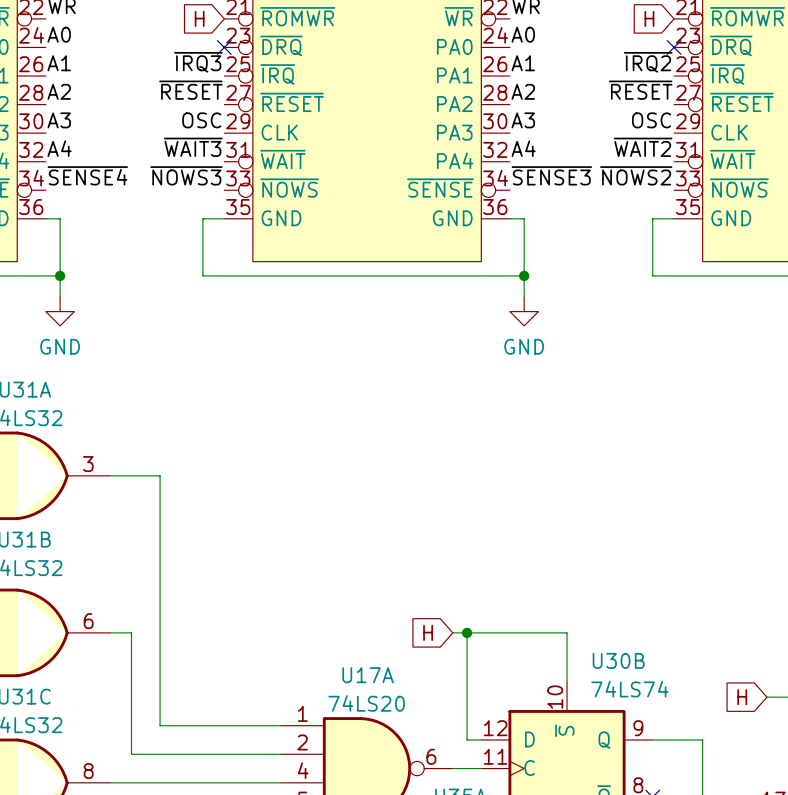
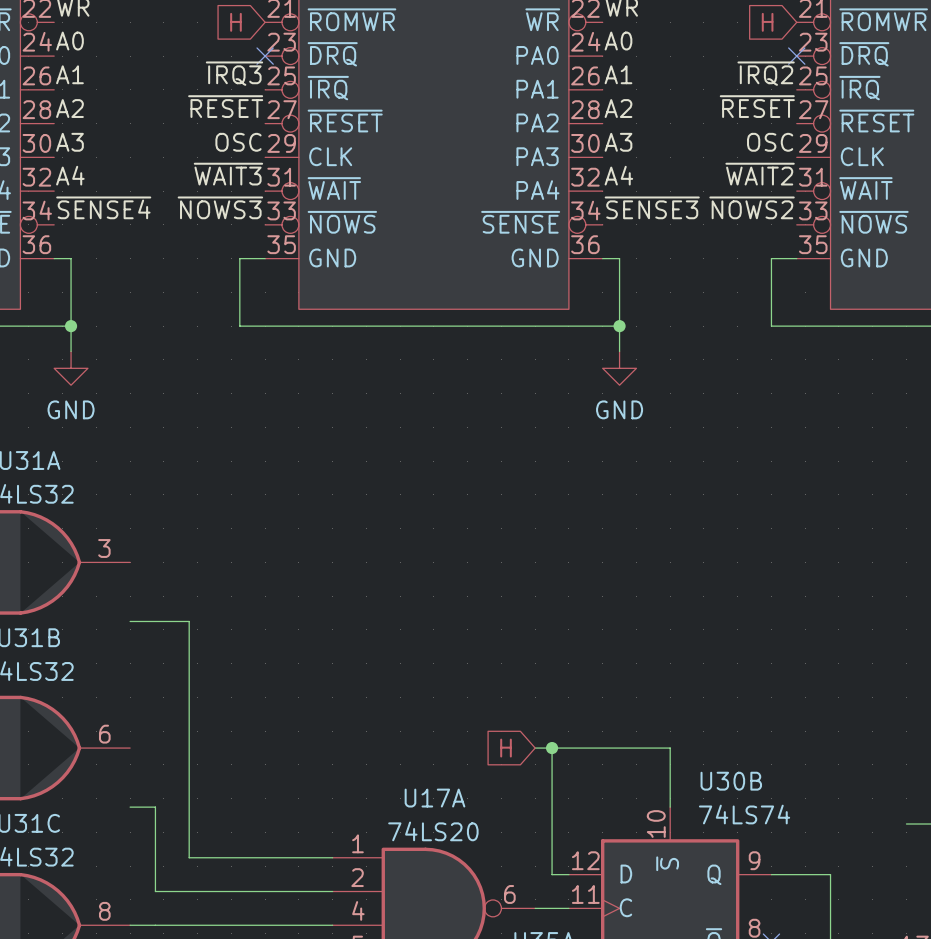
wire: (110, 475) (160, 475) (160, 525) -> (130, 621) (189, 621)
wire: (110, 632) (131, 632) (131, 682) -> (130, 807) (155, 807)
global label: H (742, 697) -> none

